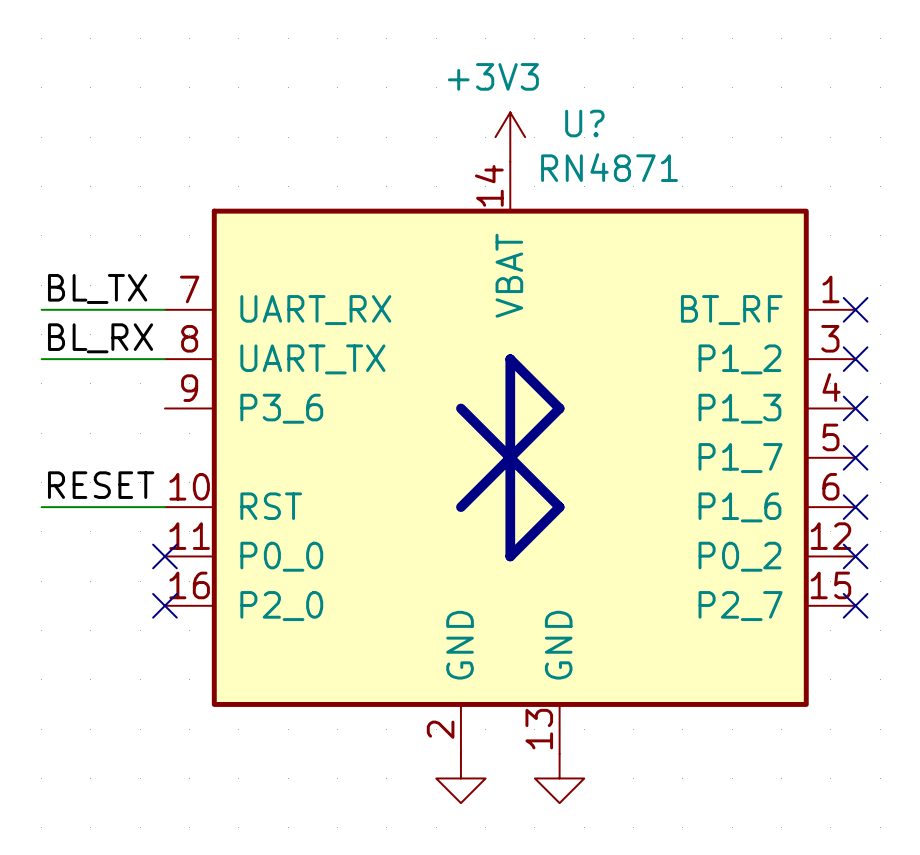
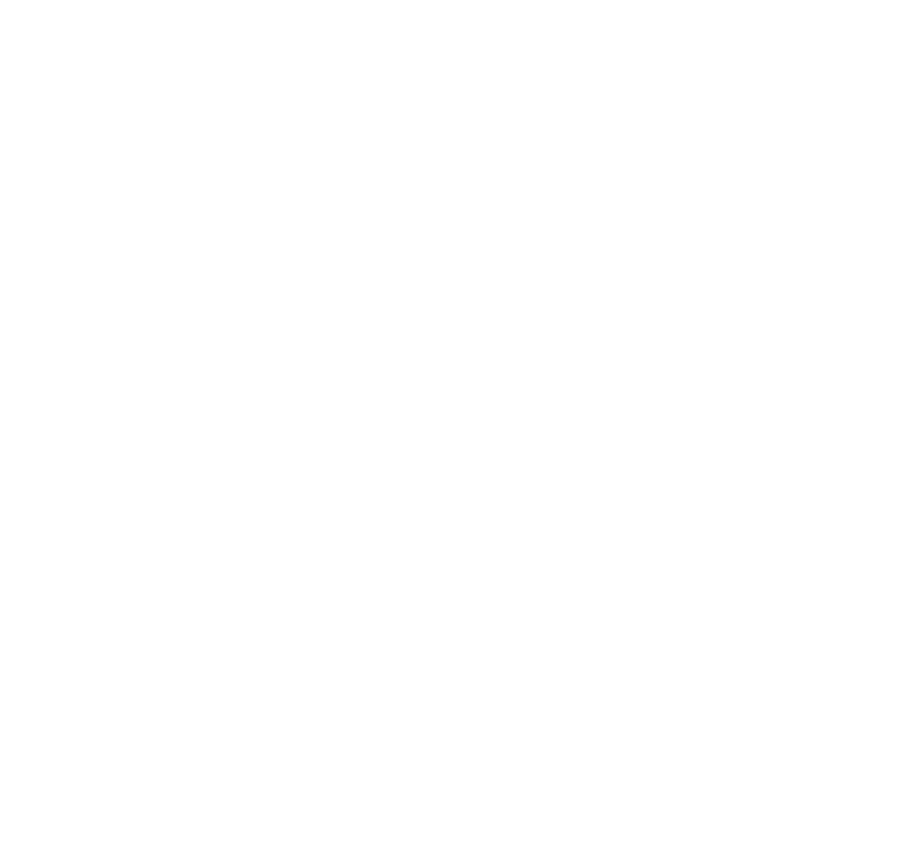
power symbol: +3V3 (510, 137) -> none
label: BL_TX (97, 288) -> none
wire: (41, 309) (164, 309) -> none
no-connect mark: (855, 309) -> none
label: BL_RX (100, 338) -> none
wire: (41, 359) (164, 359) -> none
no-connect mark: (855, 359) -> none
line: (460, 408) (559, 507) (510, 556) (510, 359) (559, 408) (460, 507) -> none
no-connect mark: (855, 408) -> none
U?: RN4871 (510, 457) -> none
no-connect mark: (855, 457) -> none
label: RESET (101, 485) -> none
wire: (41, 507) (164, 507) -> none
no-connect mark: (855, 507) -> none
no-connect mark: (164, 556) -> none
no-connect mark: (855, 556) -> none
no-connect mark: (164, 605) -> none
no-connect mark: (855, 605) -> none
power symbol: (460, 778) -> none
power symbol: (559, 778) -> none

